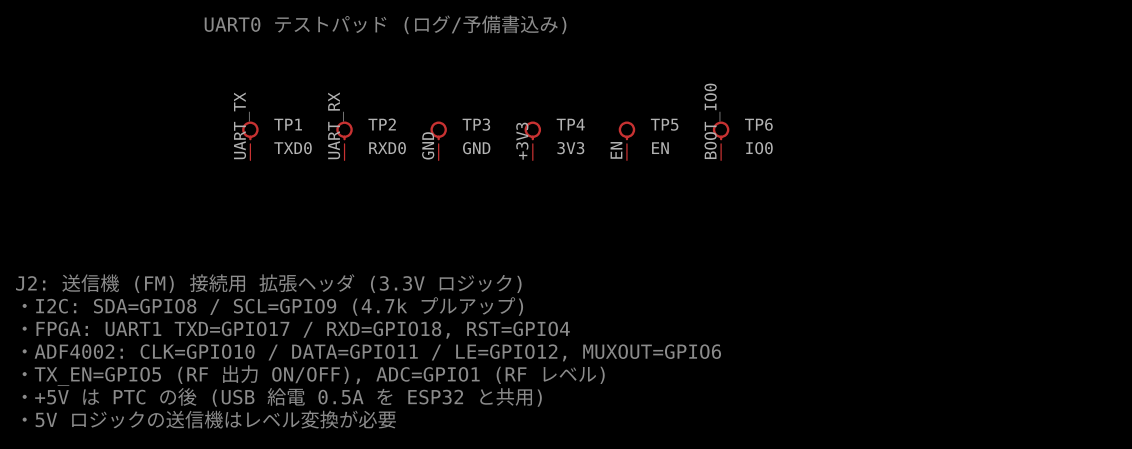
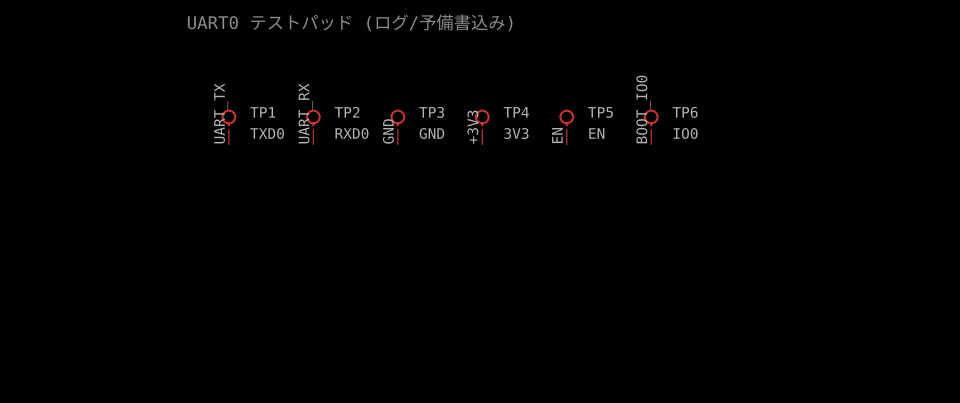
text: J2: 送信機 (FM) 接続用 拡張ヘッダ (3.3V ロジック) (268, 283) -> none
text: ・I2C: SDA=GPIO8 / SCL=GPIO9 (4.7k プルアップ) (272, 306) -> none
text: ・FPGA: UART1 TXD=GPIO17 / RXD=GPIO18, RST=GPIO4 (296, 330) -> none
text: ・ADF4002: CLK=GPIO10 / DATA=GPIO11 / LE=GPIO12, MUXOUT=GPIO6 (371, 352) -> none
text: ・TX_EN=GPIO5 (RF 出力 ON/OFF), ADC=GPIO1 (RF レベル) (313, 375) -> none
text: ・+5V は PTC の後 (USB 給電 0.5A を ESP32 と共用) (282, 397) -> none
text: ・5V ロジックの送信機はレベル変換が必要 (209, 419) -> none

